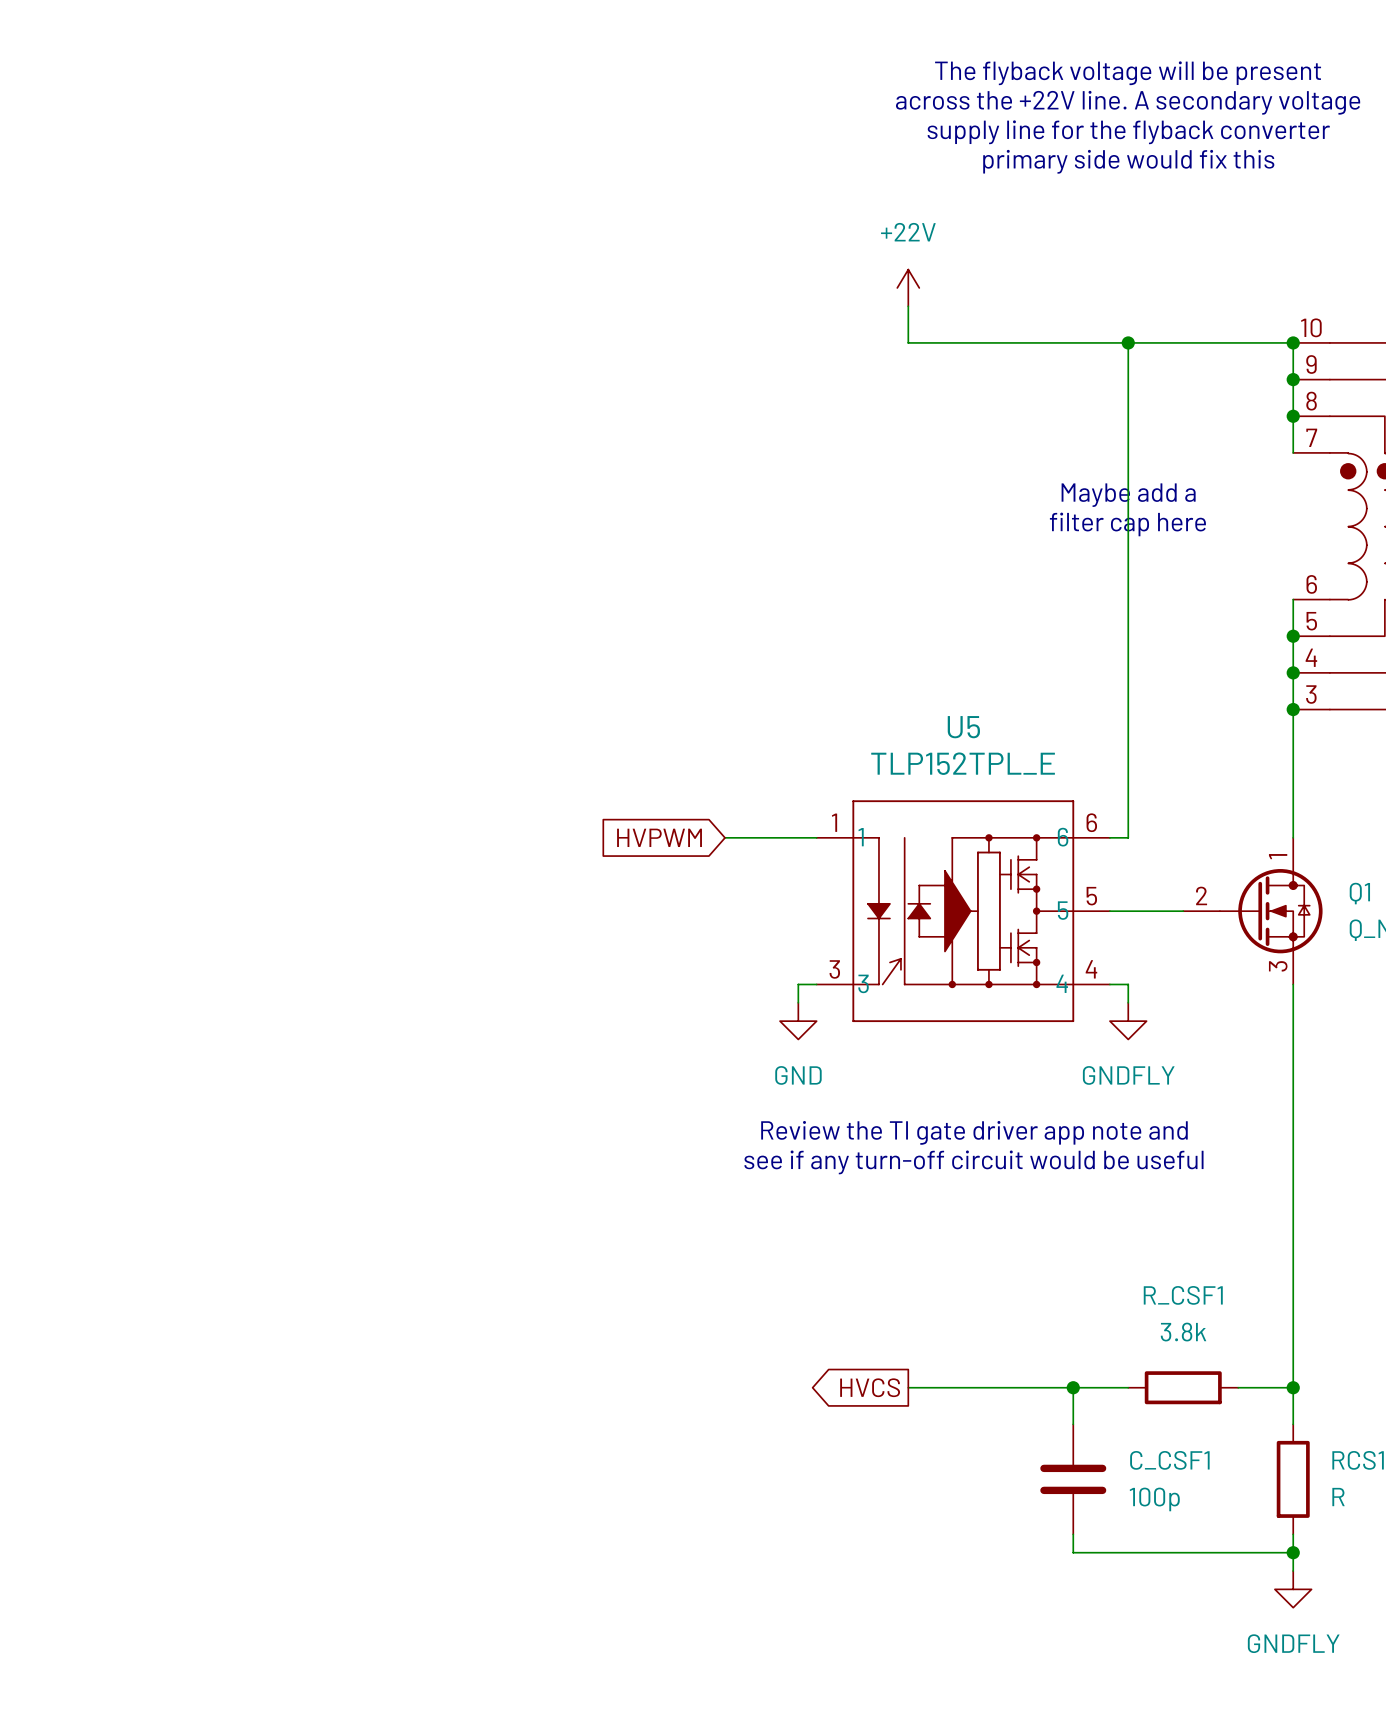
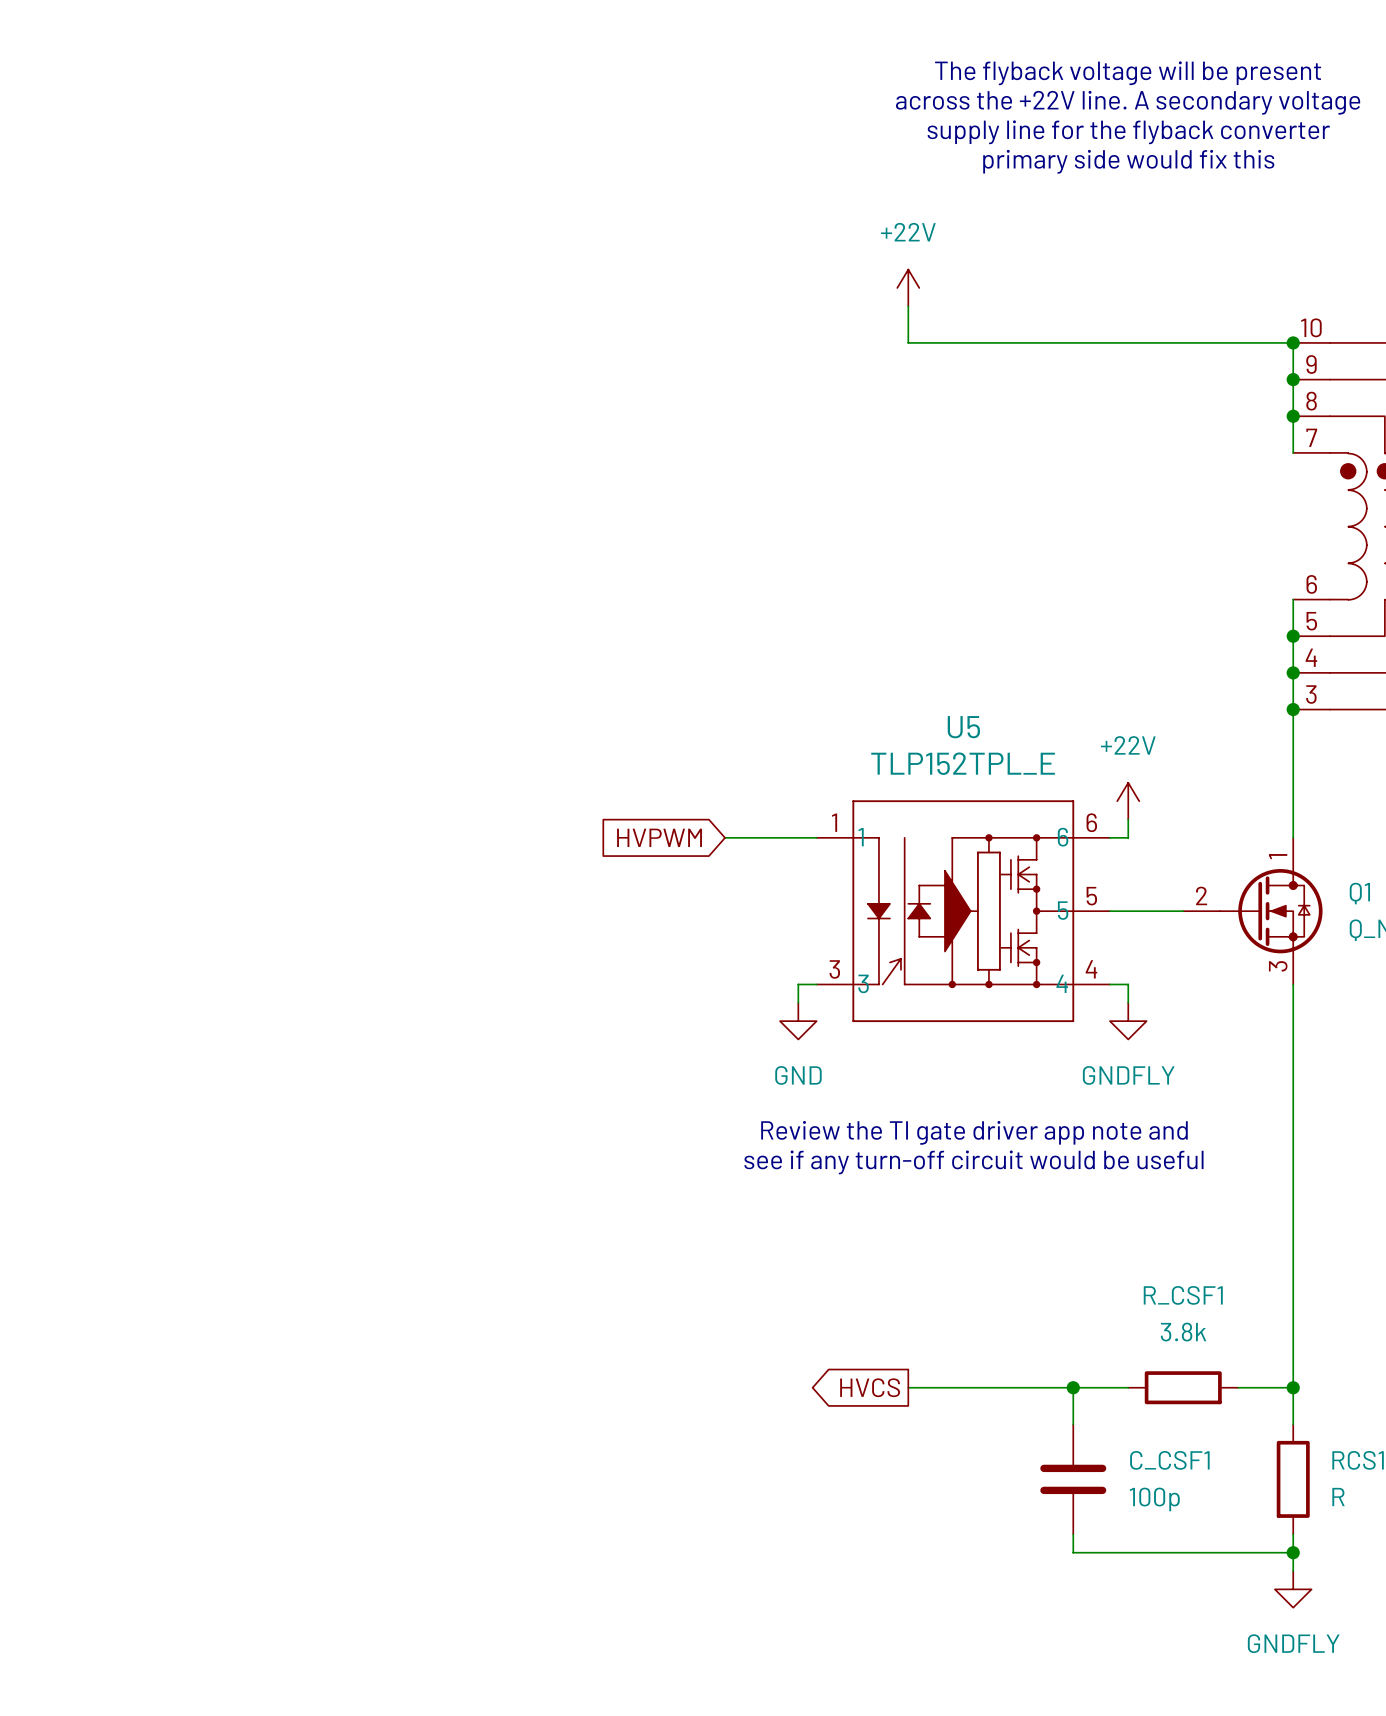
wire: (1128, 342) (1128, 819) -> none
junction: (1128, 342) -> none
text: Maybe add a (1128, 495) -> none
text: filter cap here (1127, 524) -> none
power symbol: none -> +22V (1128, 801)

